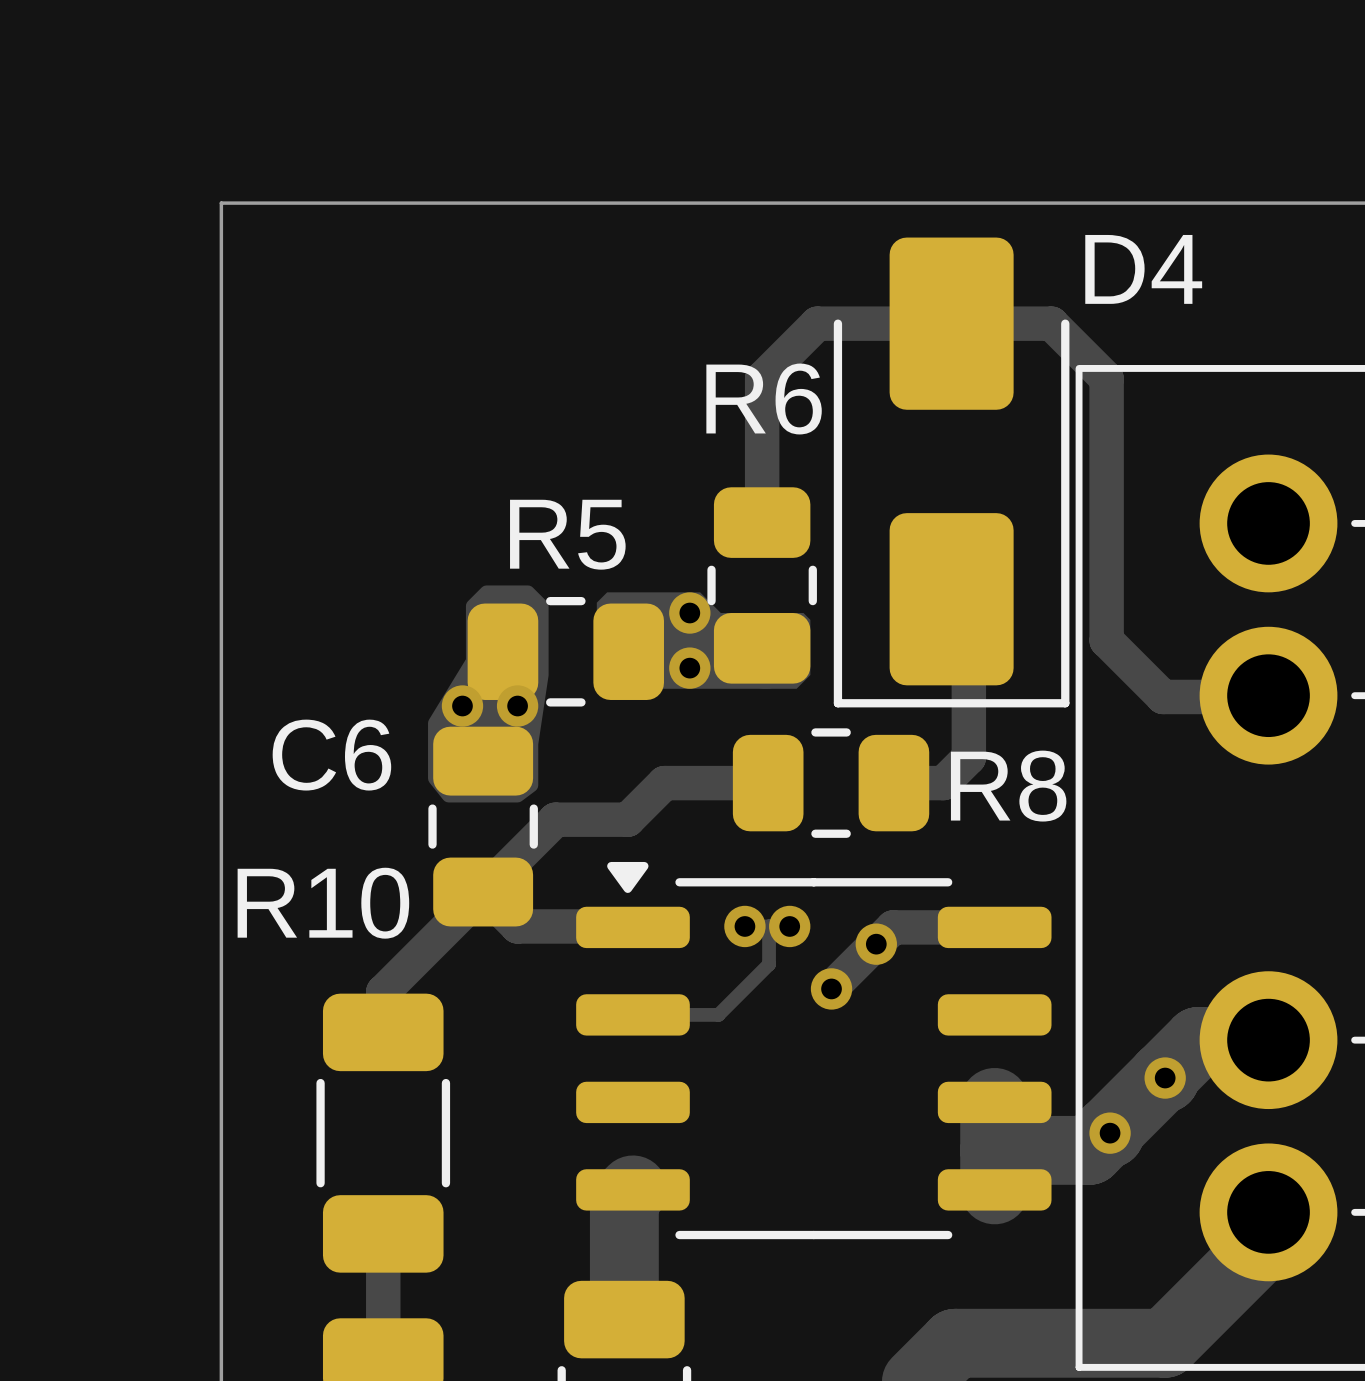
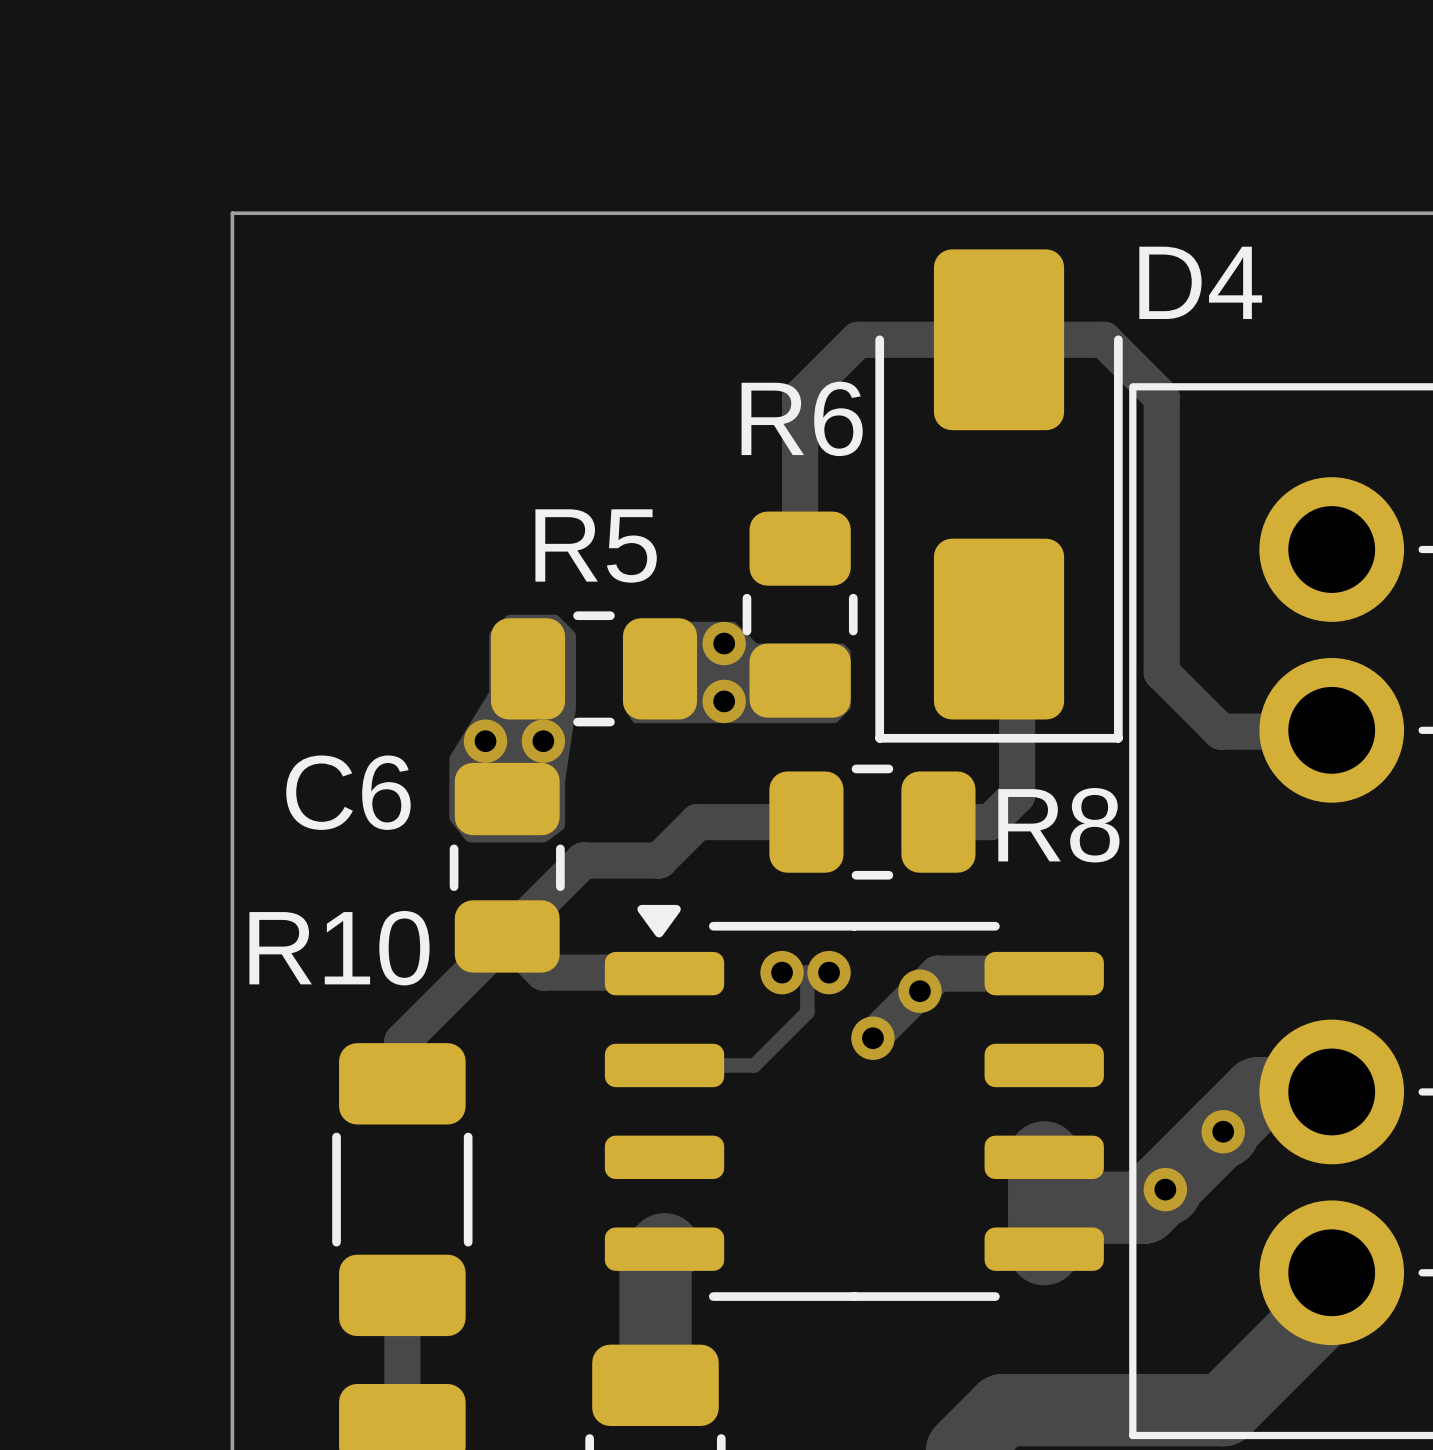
R5 position: (565, 651) -> (594, 668)

